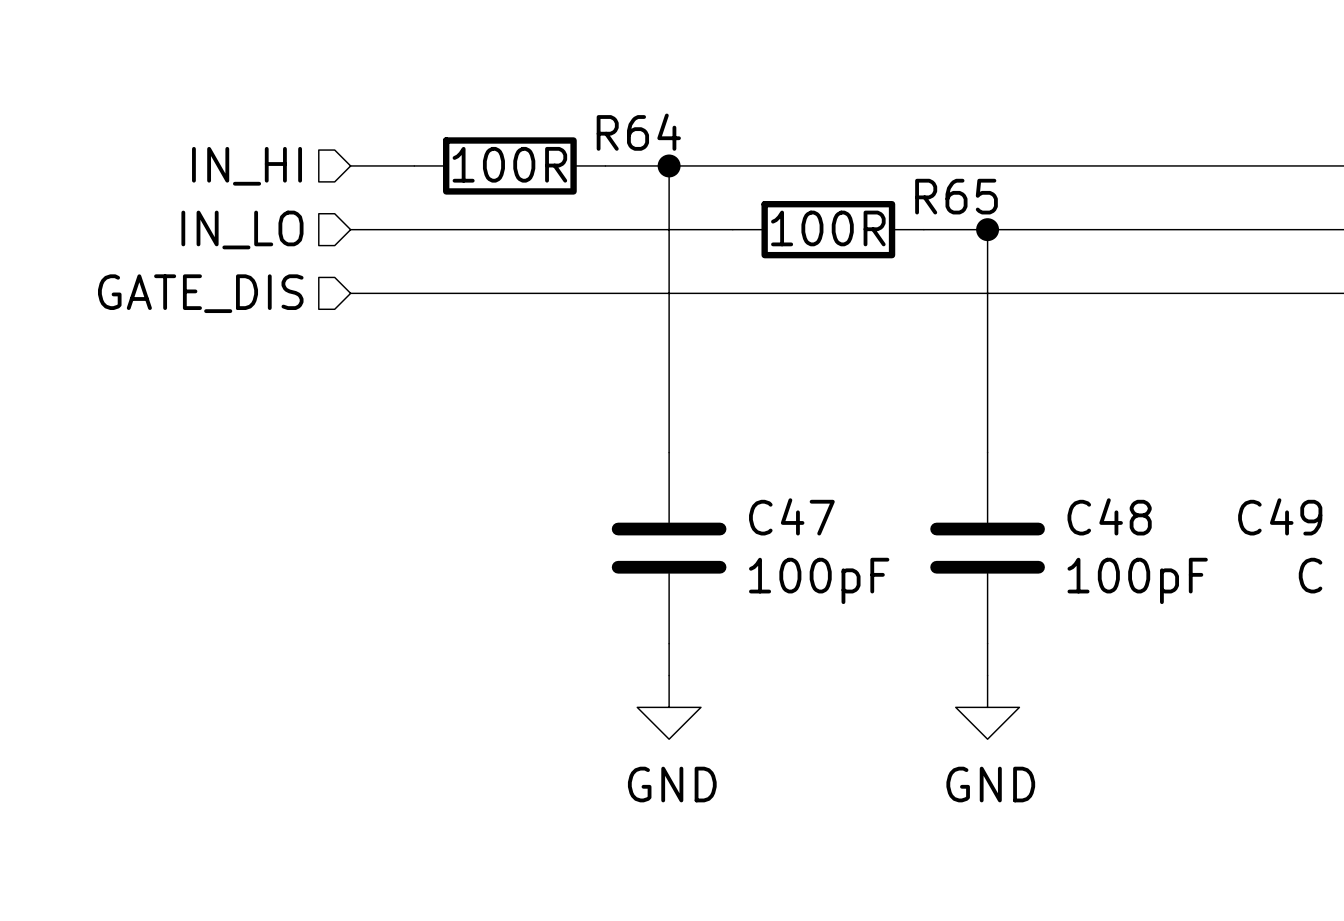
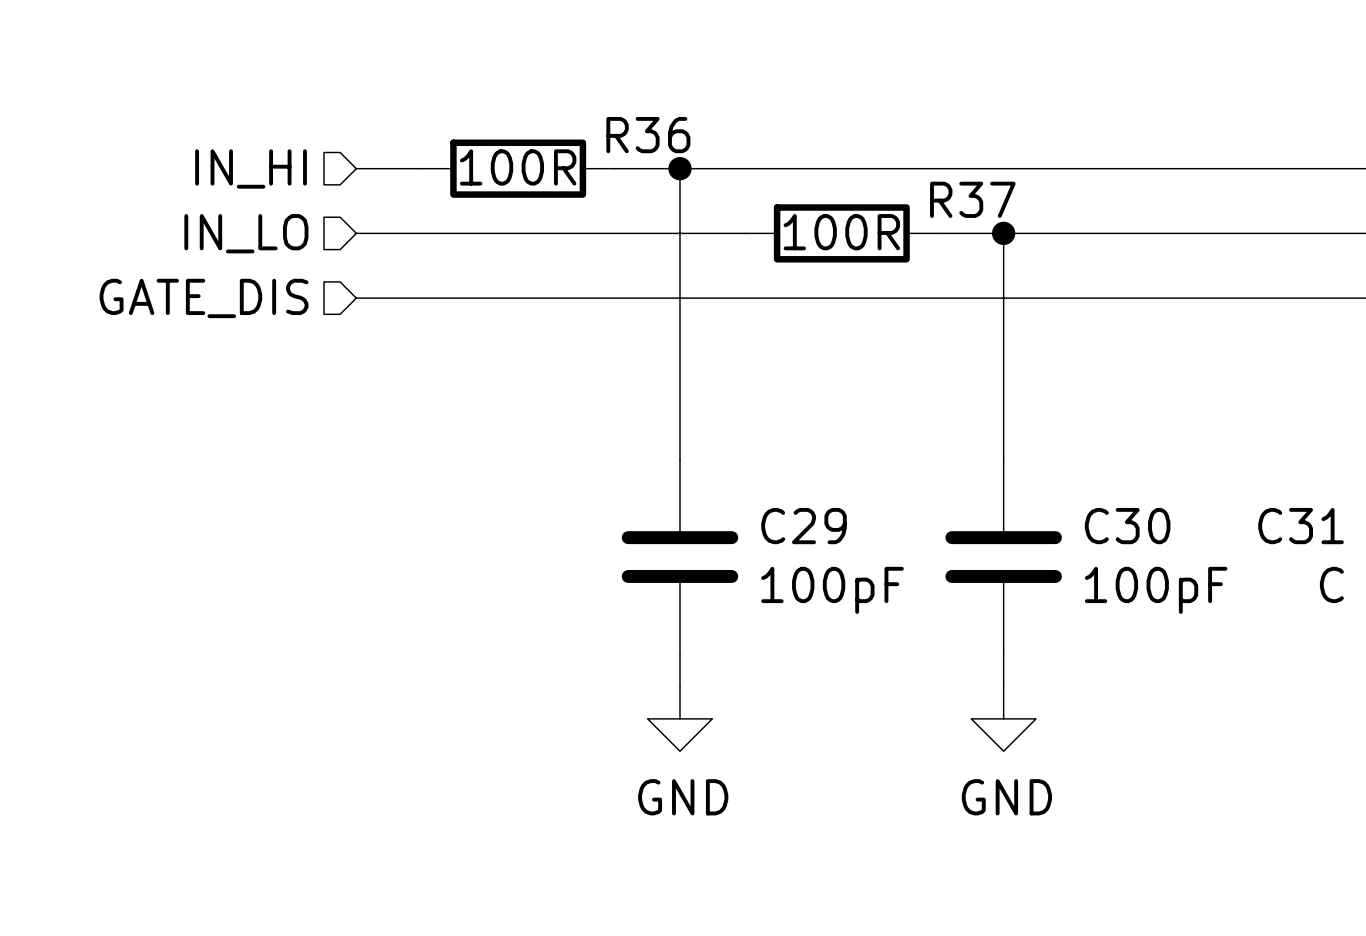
R64 name: R64 (638, 132) -> R36 (648, 135)
R65 name: R65 (956, 196) -> R37 (972, 199)
C47 name: C47 (791, 516) -> C29 (803, 526)
C48 name: C48 (1109, 516) -> C30 (1127, 526)
C49 name: C49 (1280, 516) -> C31 (1301, 526)

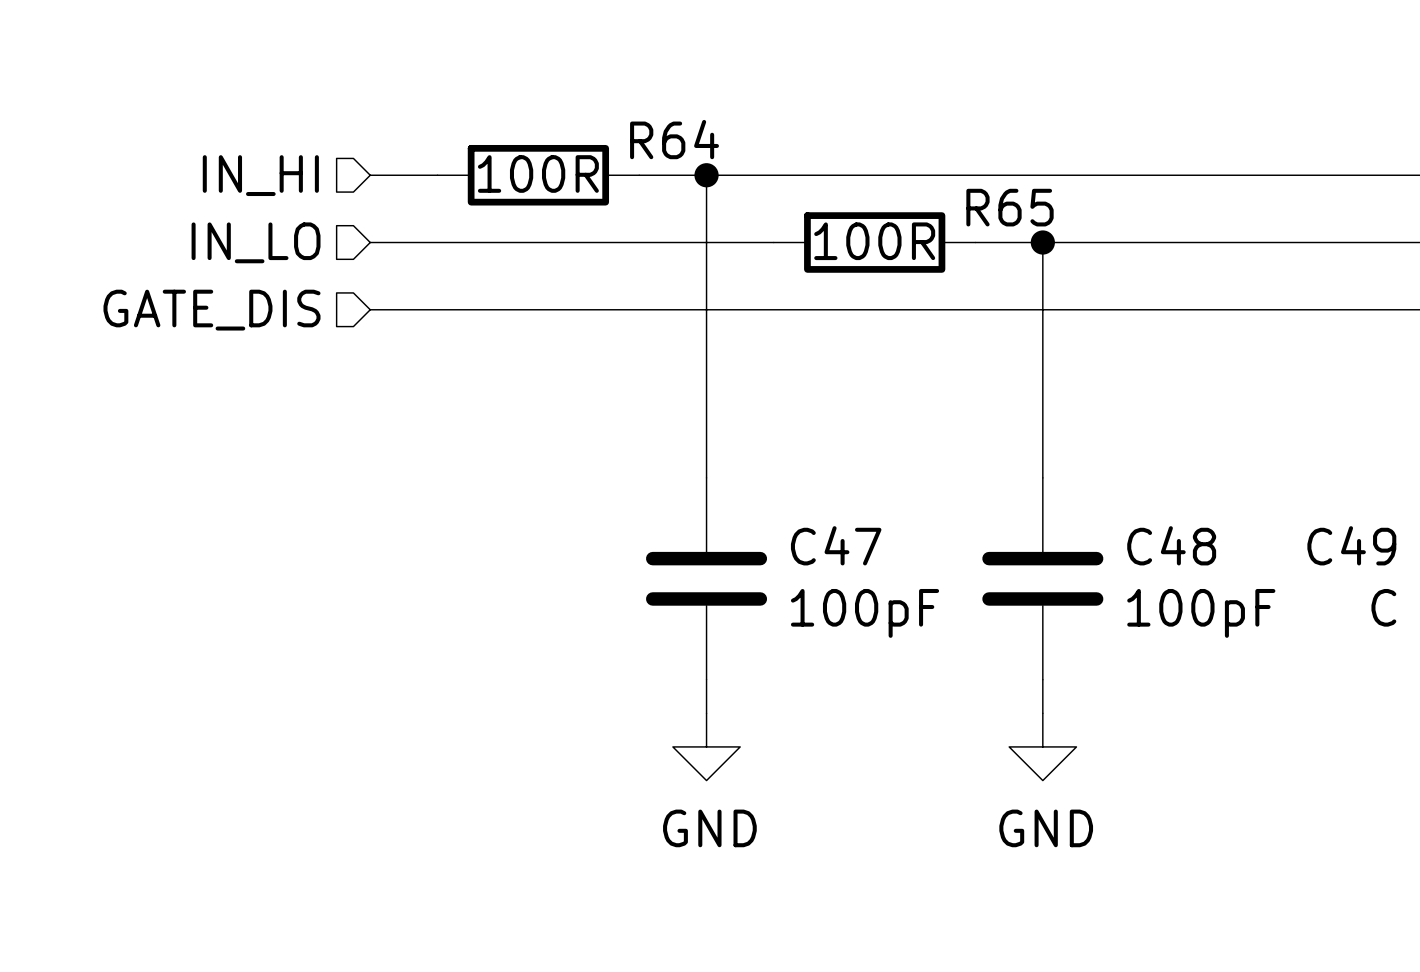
R36 name: R36 (648, 135) -> R64 (674, 139)
R37 name: R37 (972, 199) -> R65 (1010, 207)
C29 name: C29 (803, 526) -> C47 (836, 545)
C30 name: C30 (1127, 526) -> C48 (1171, 545)
C31 name: C31 (1301, 526) -> C49 (1351, 545)

